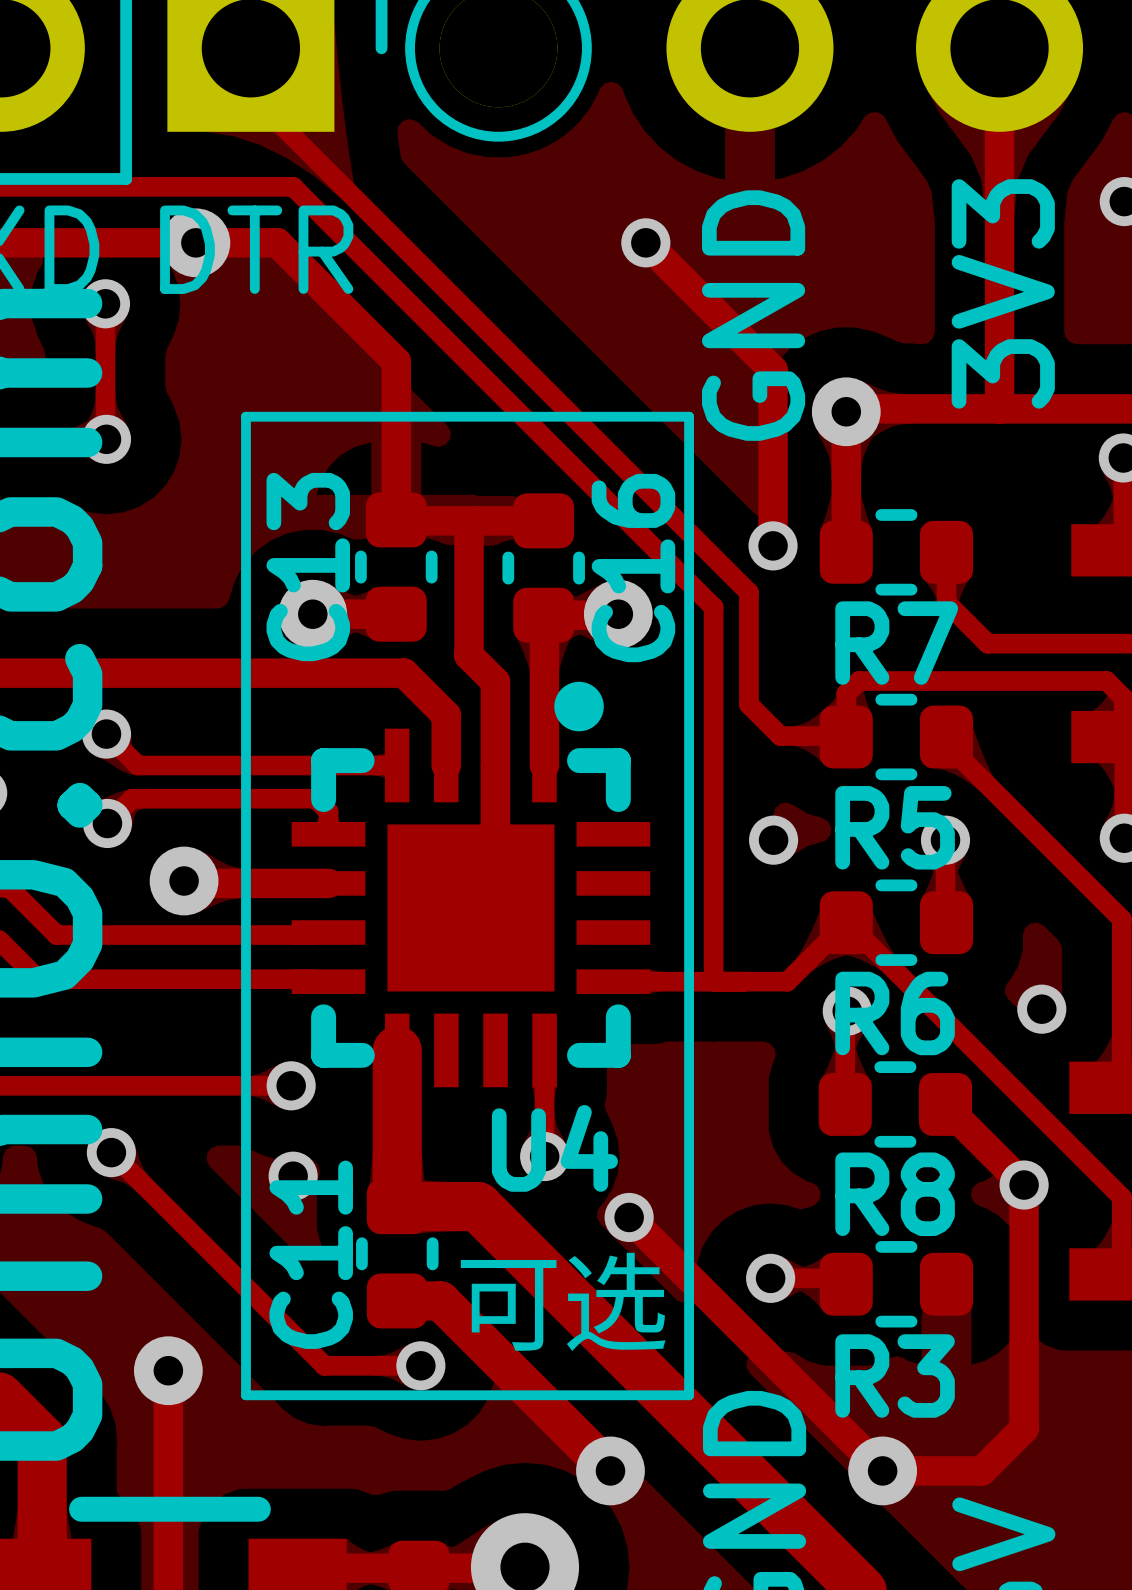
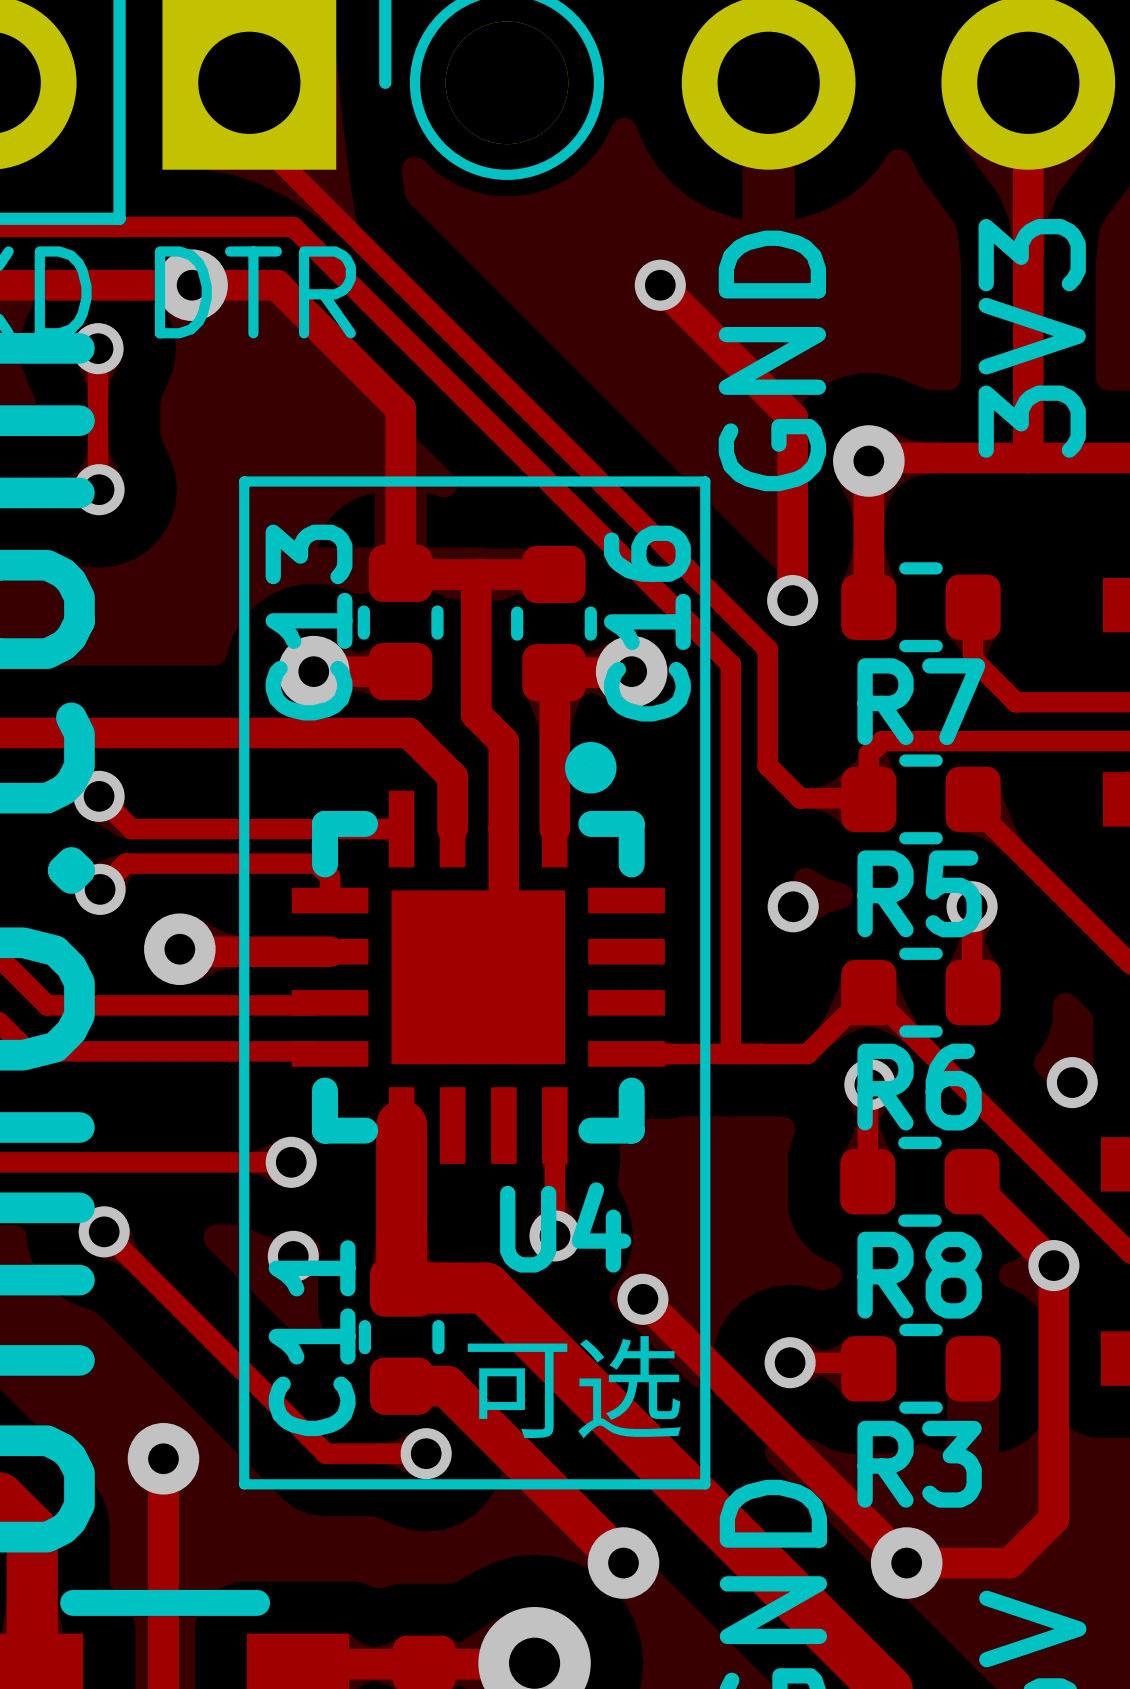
line: (245, 431) (245, 416) (689, 416) (689, 431) -> (244, 481) (705, 481)

